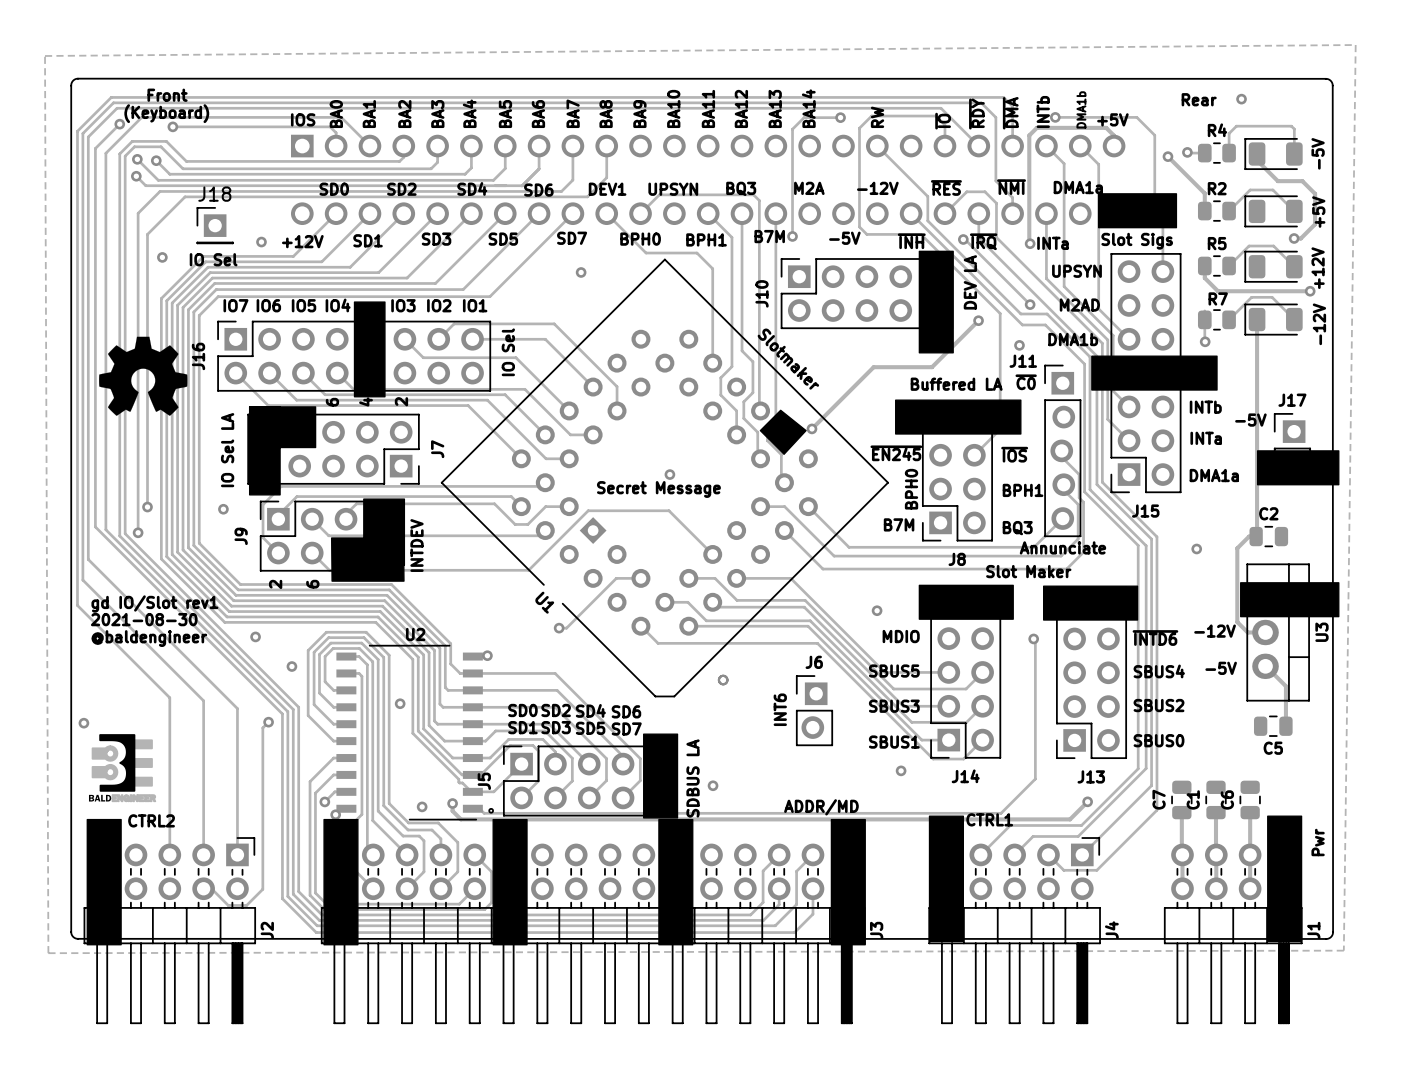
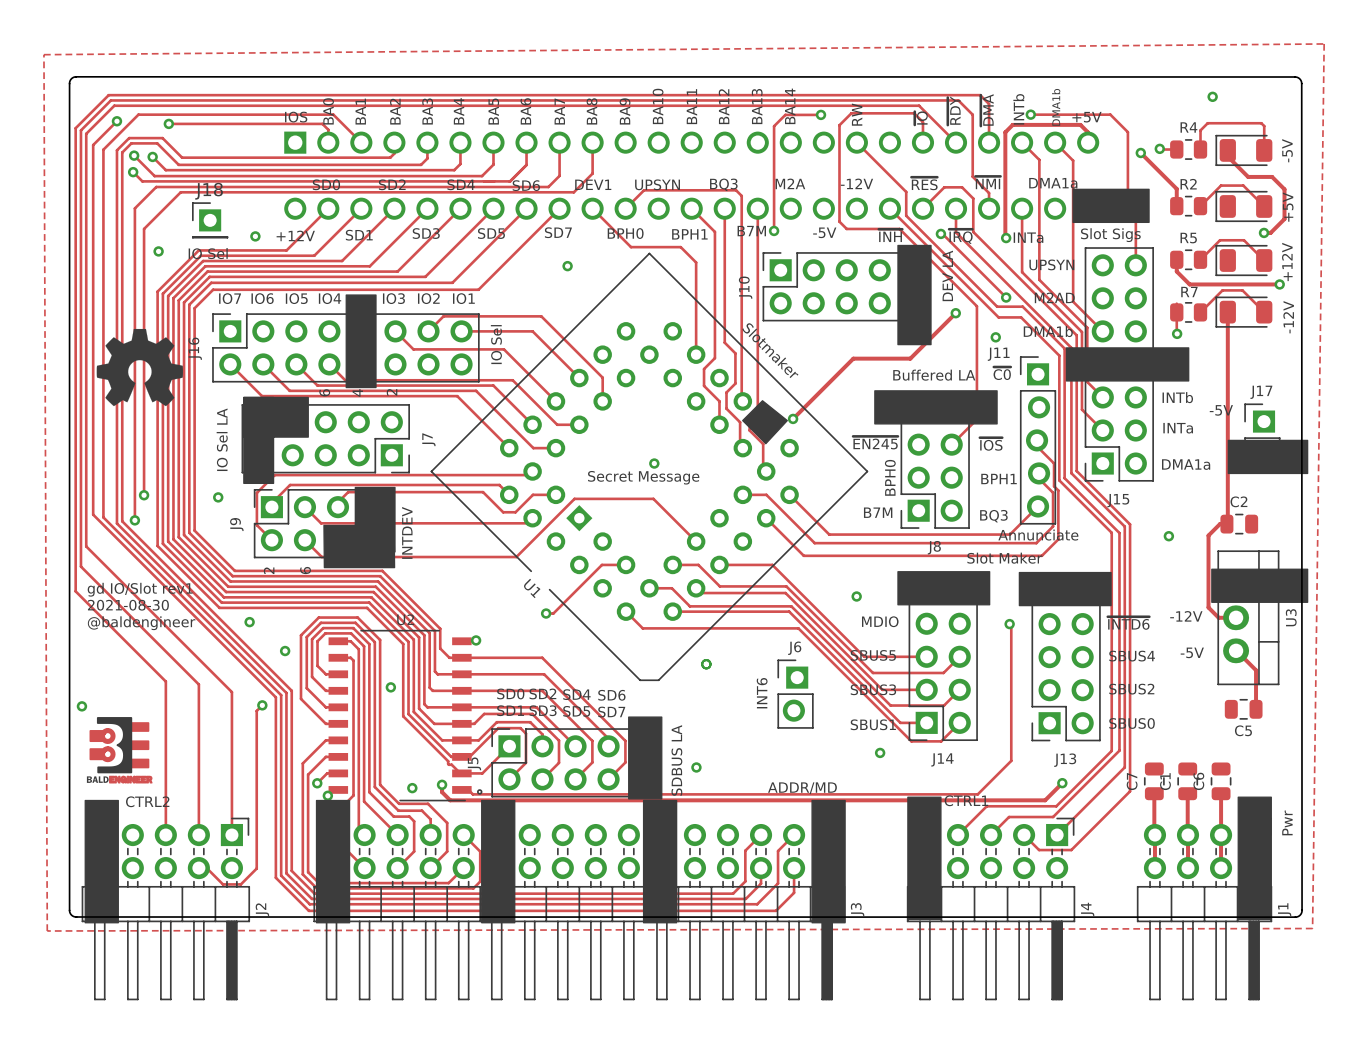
text: Front (167, 95) -> none
text: Rear (1199, 99) -> none
text: (Keyboard) (166, 113) -> none

